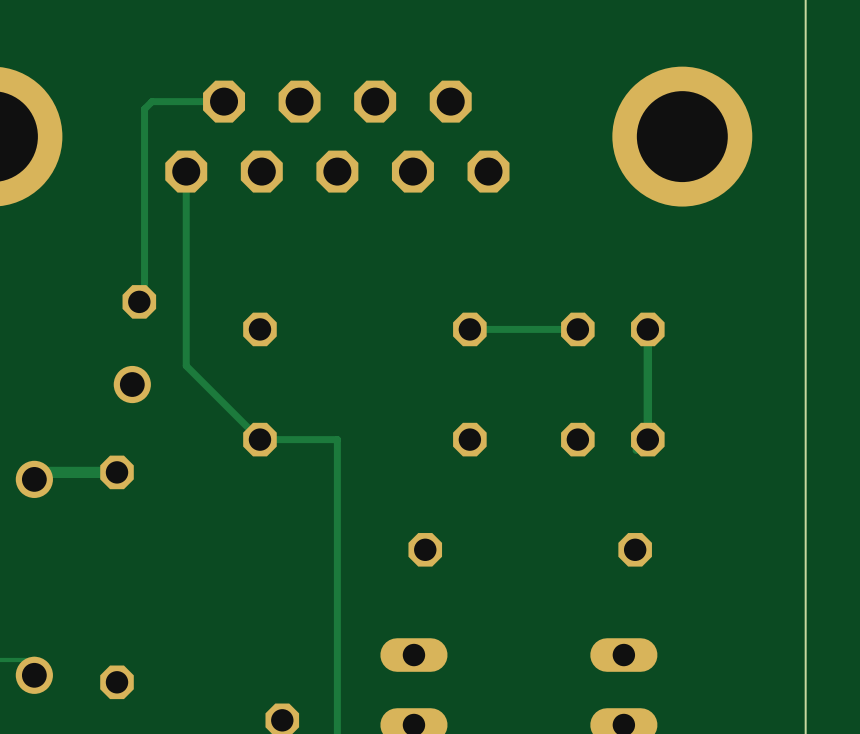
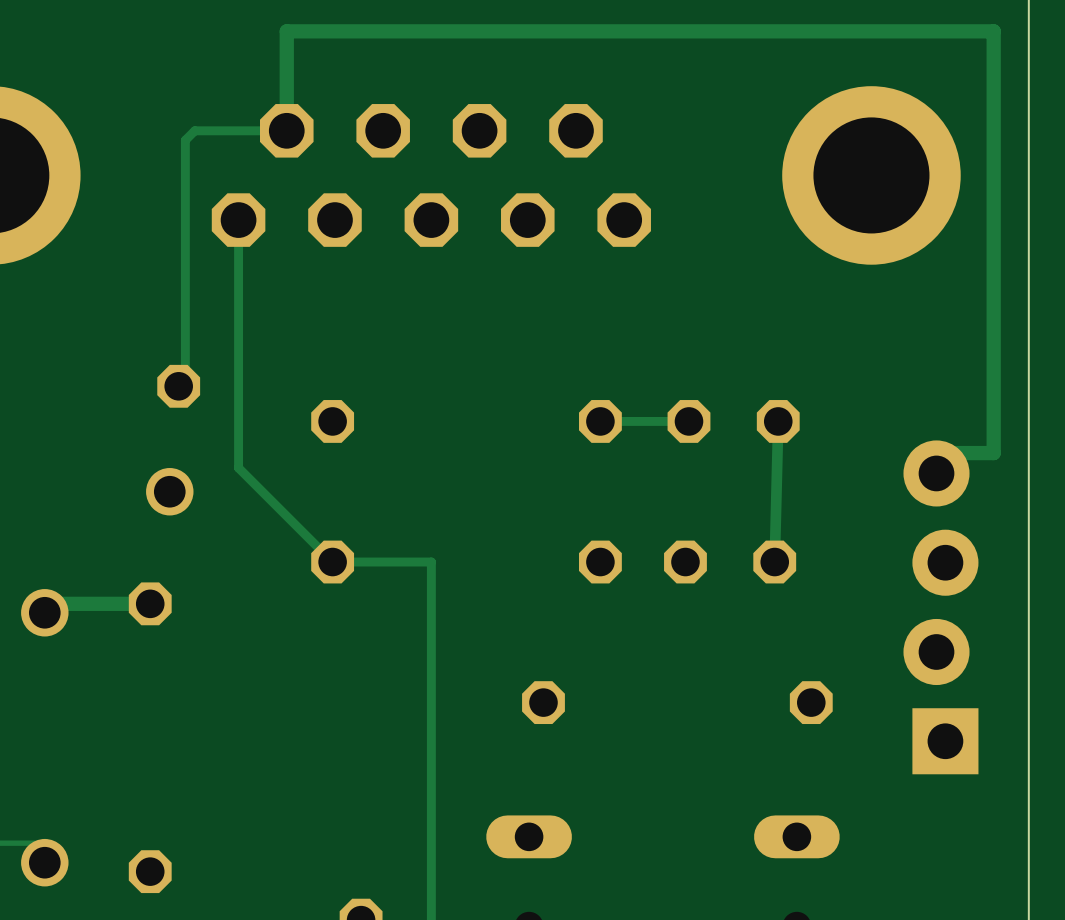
track: none -> (286, 130) (286, 31) (993, 31) (993, 453) (937, 453)
track: (577, 329) (539, 329) -> none
track: none -> (778, 421) (774, 562)
part position: (612, 329) -> (733, 421)
track: (647, 329) (647, 439) (635, 450) -> none
part position: (612, 439) -> (730, 562)
part: none -> (940, 607)

